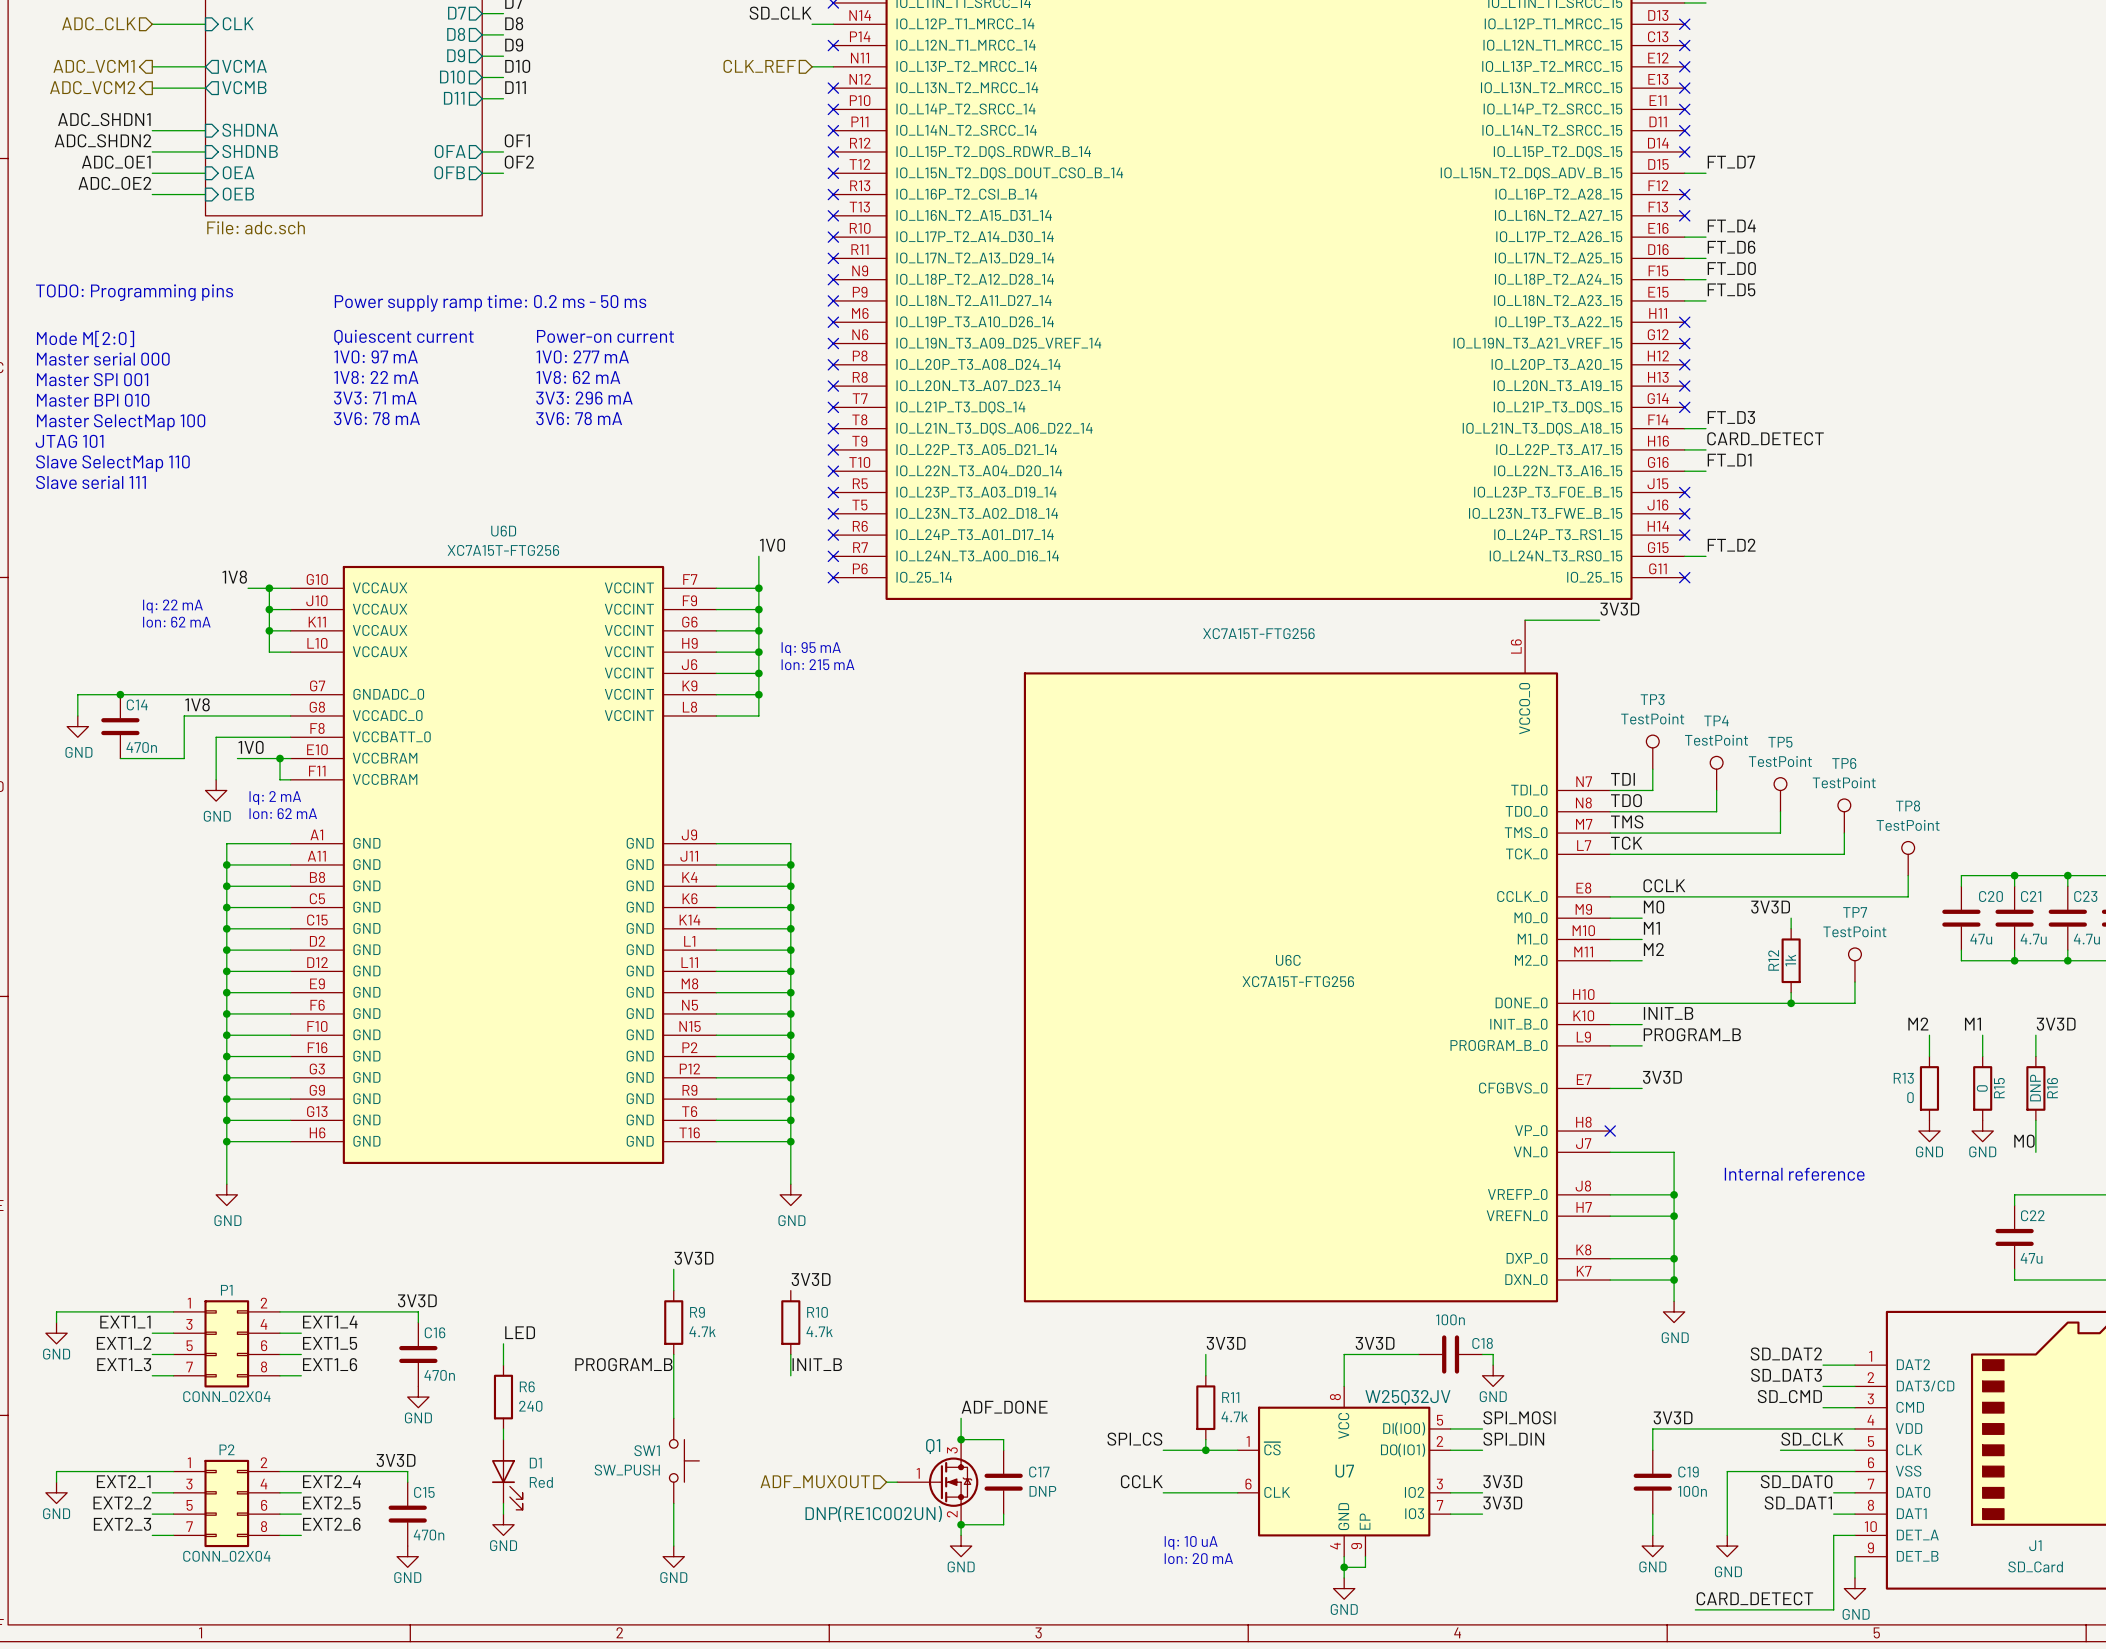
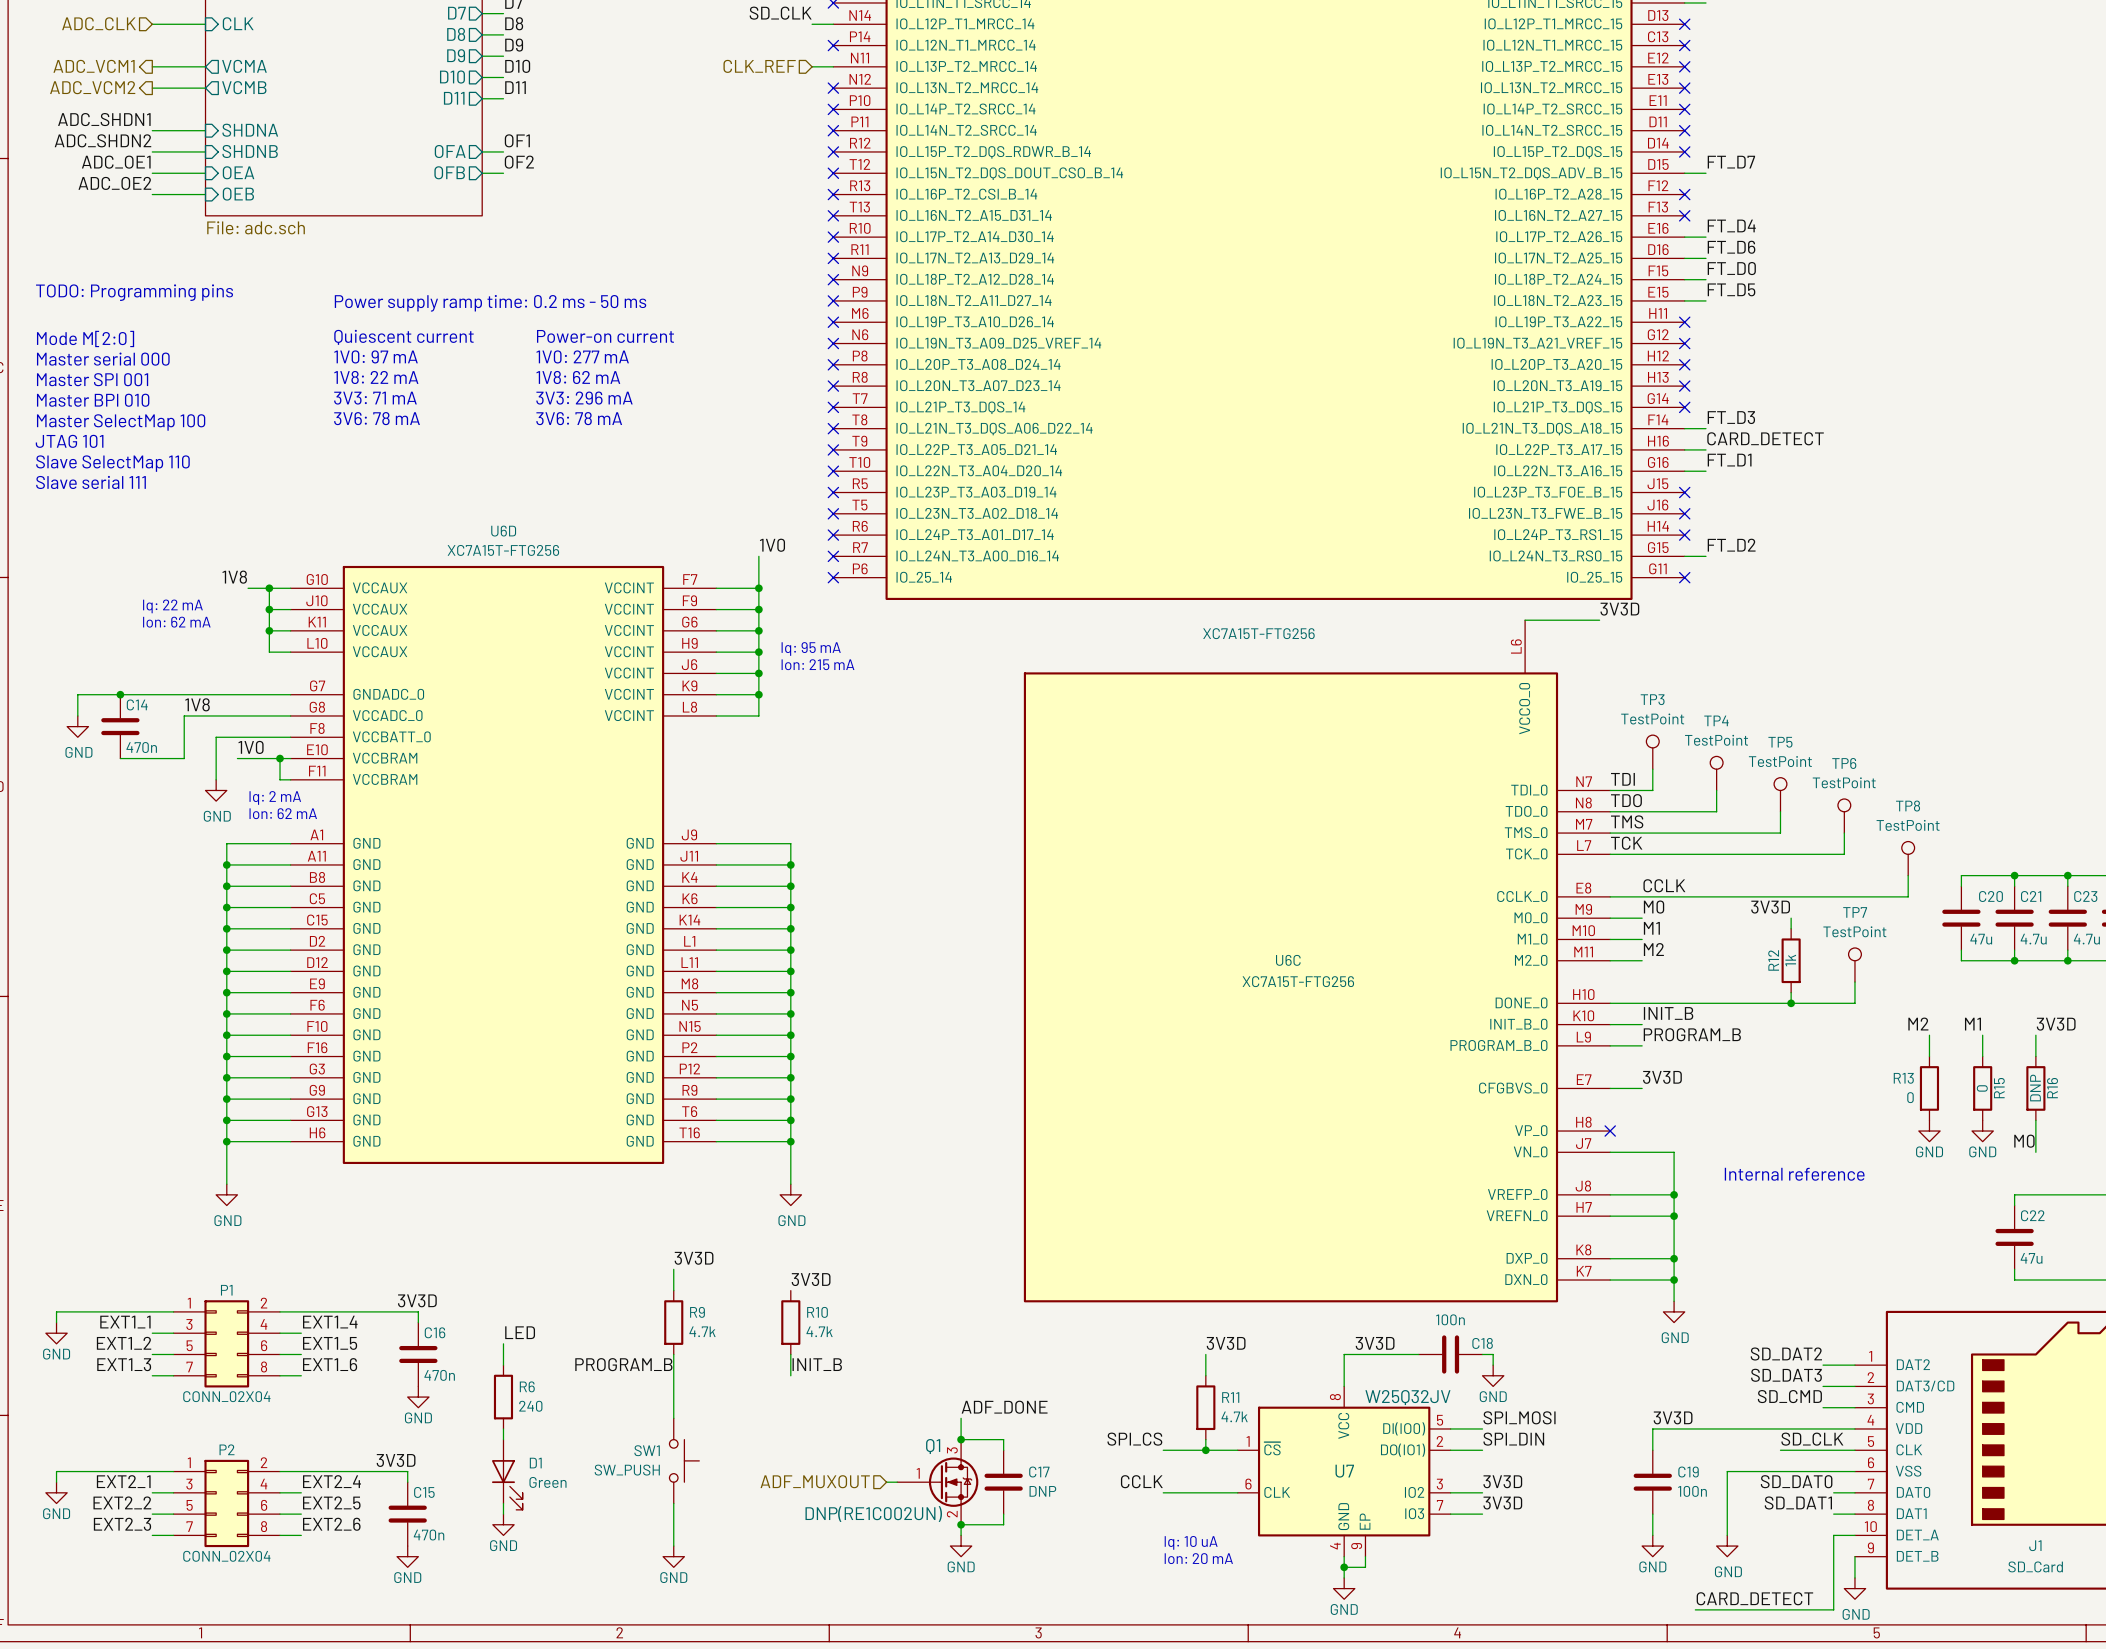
D1 value: Red (541, 1482) -> Green (547, 1482)

